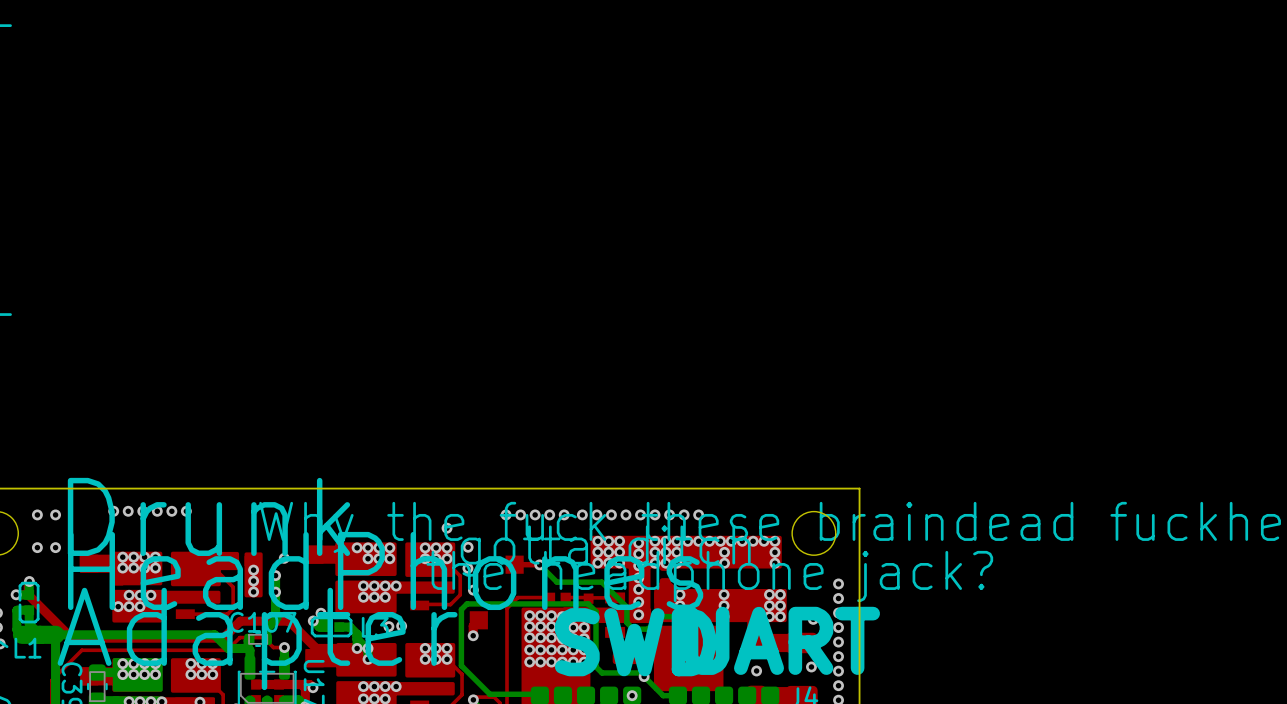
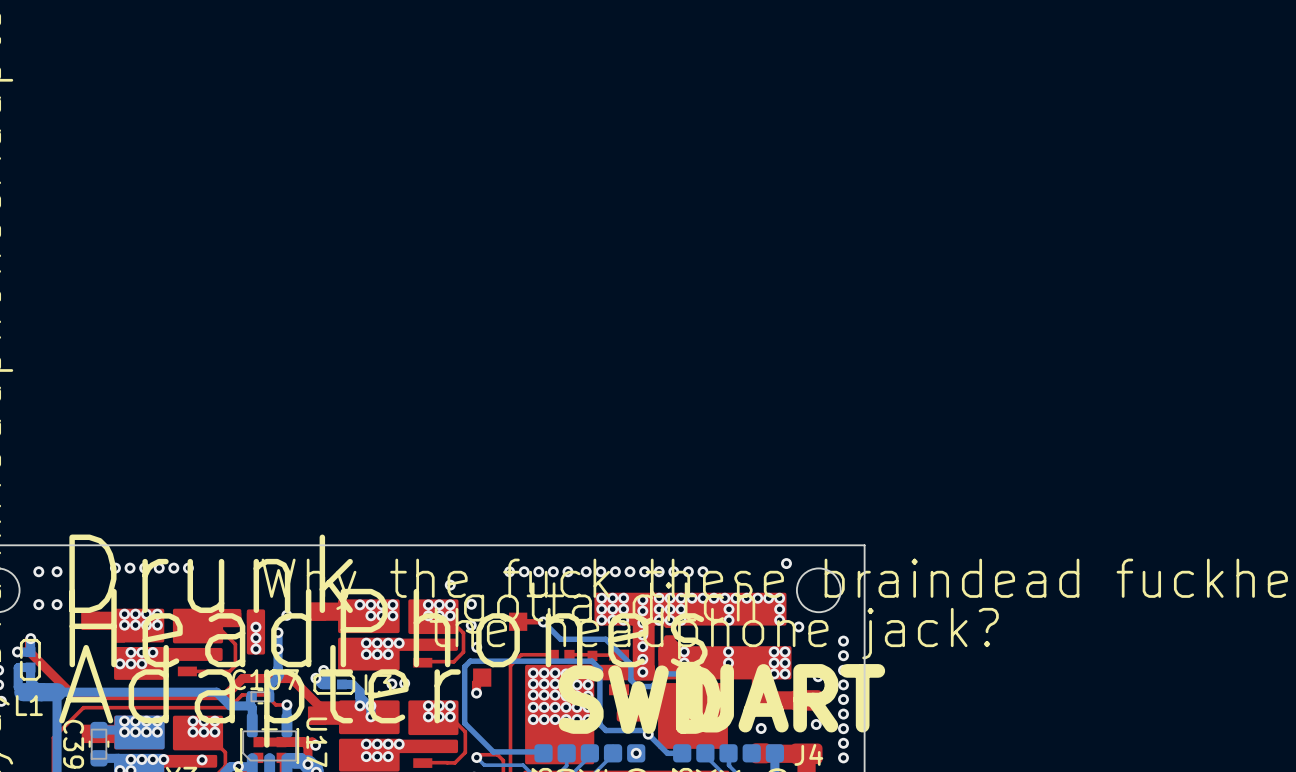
via: none -> (786, 563)
via: none -> (798, 626)

